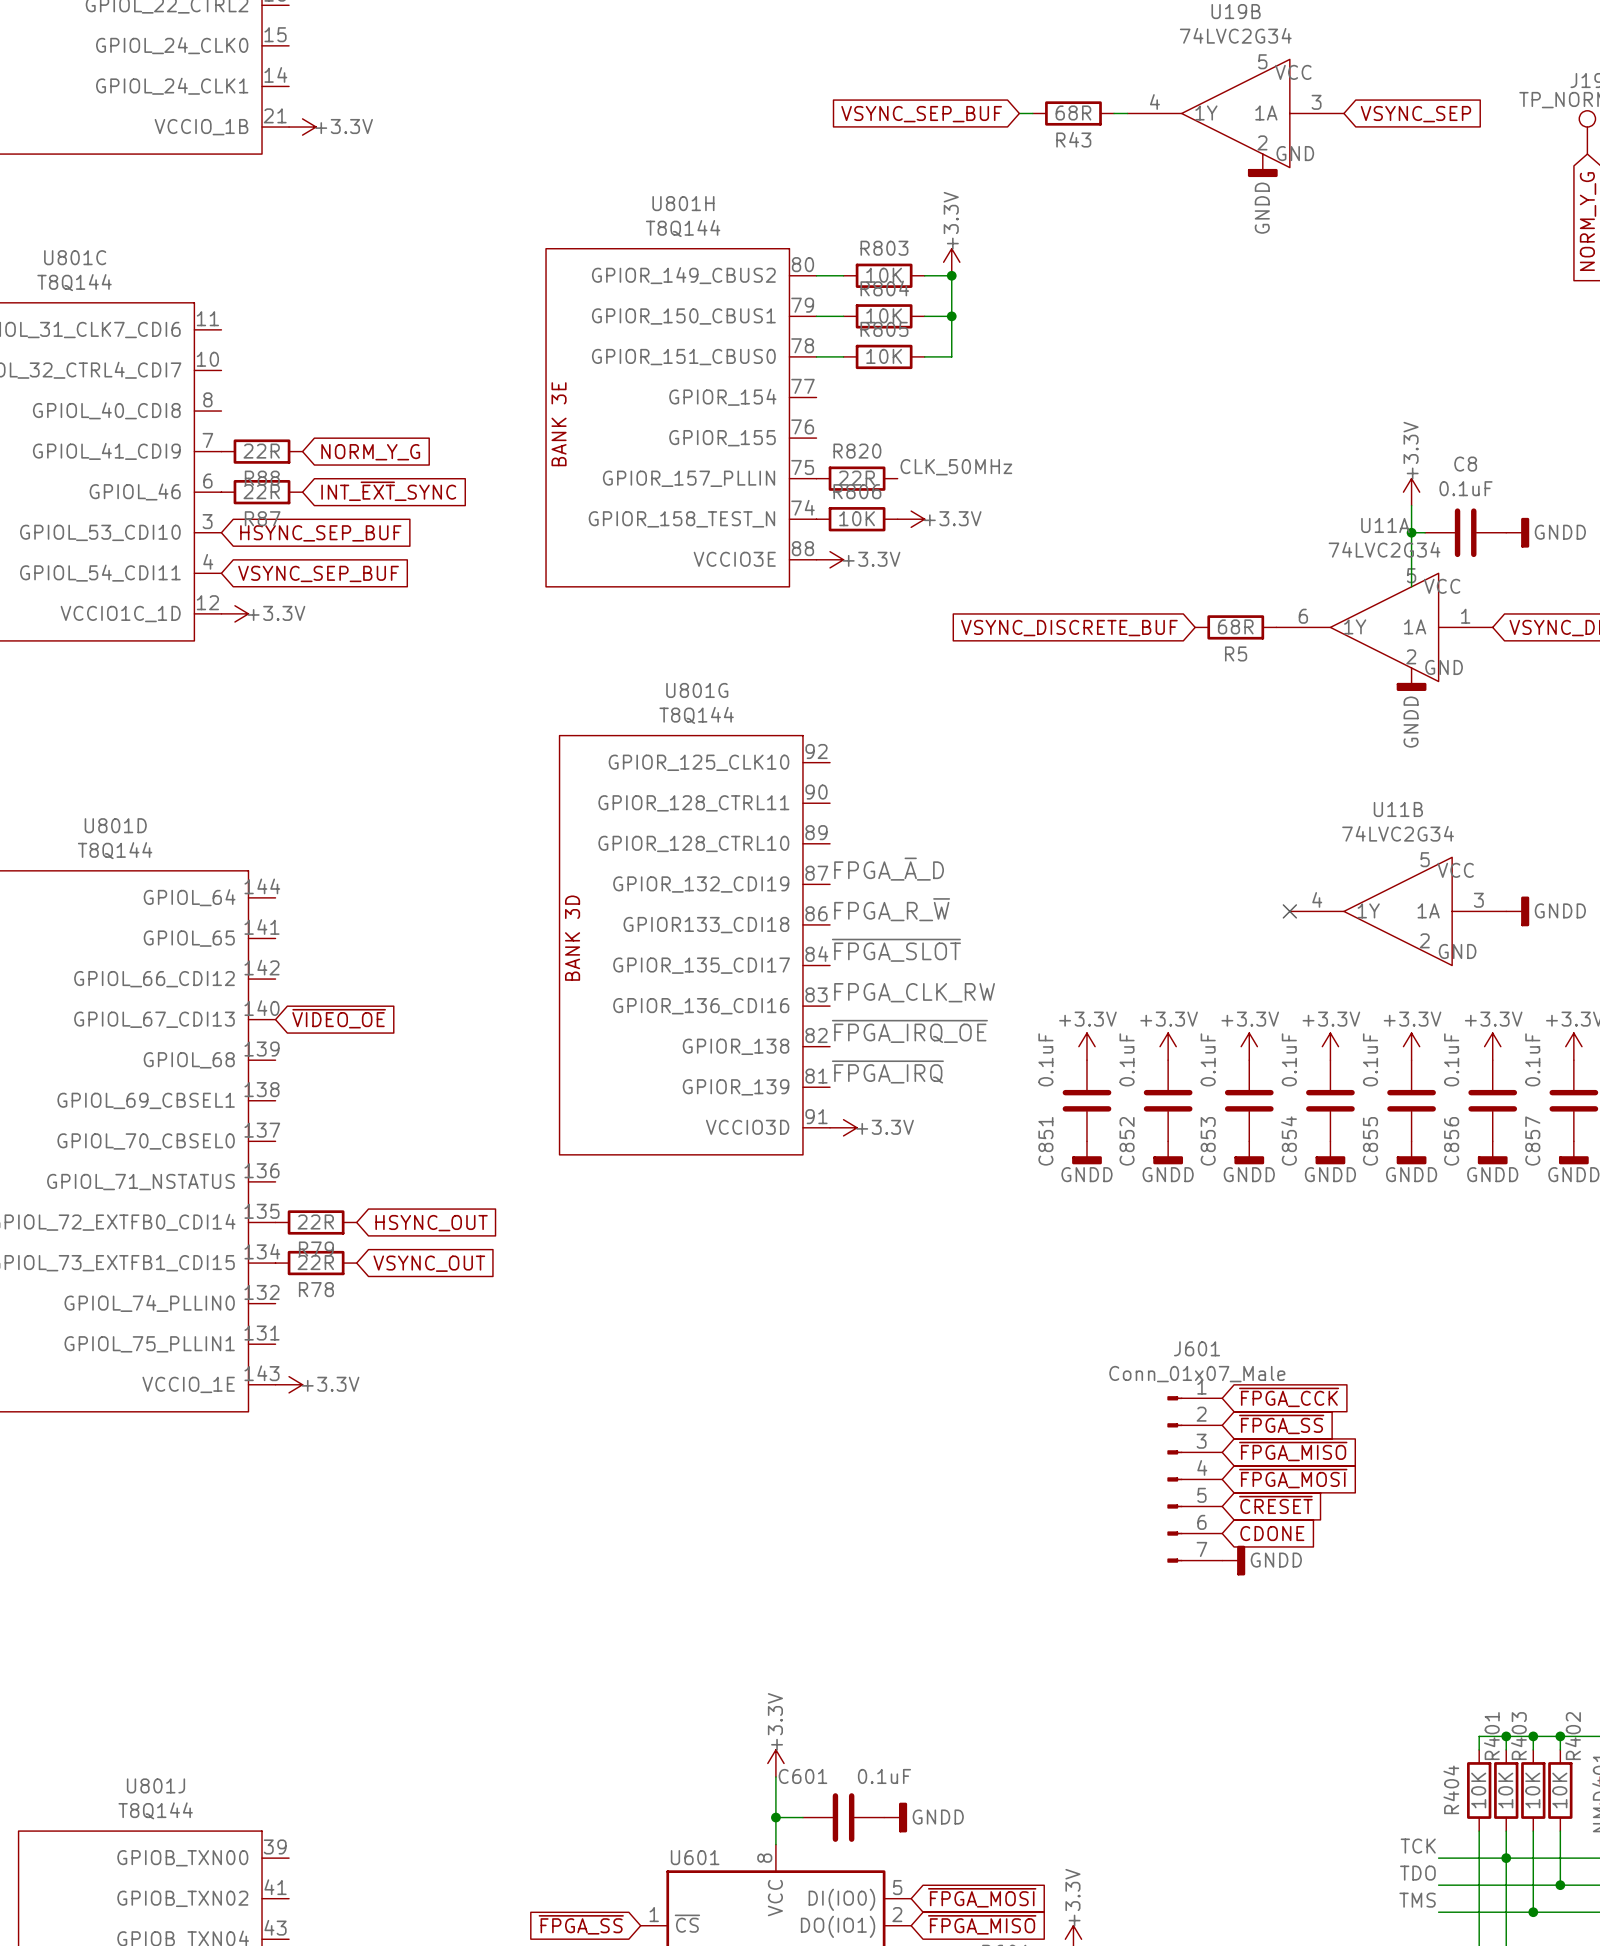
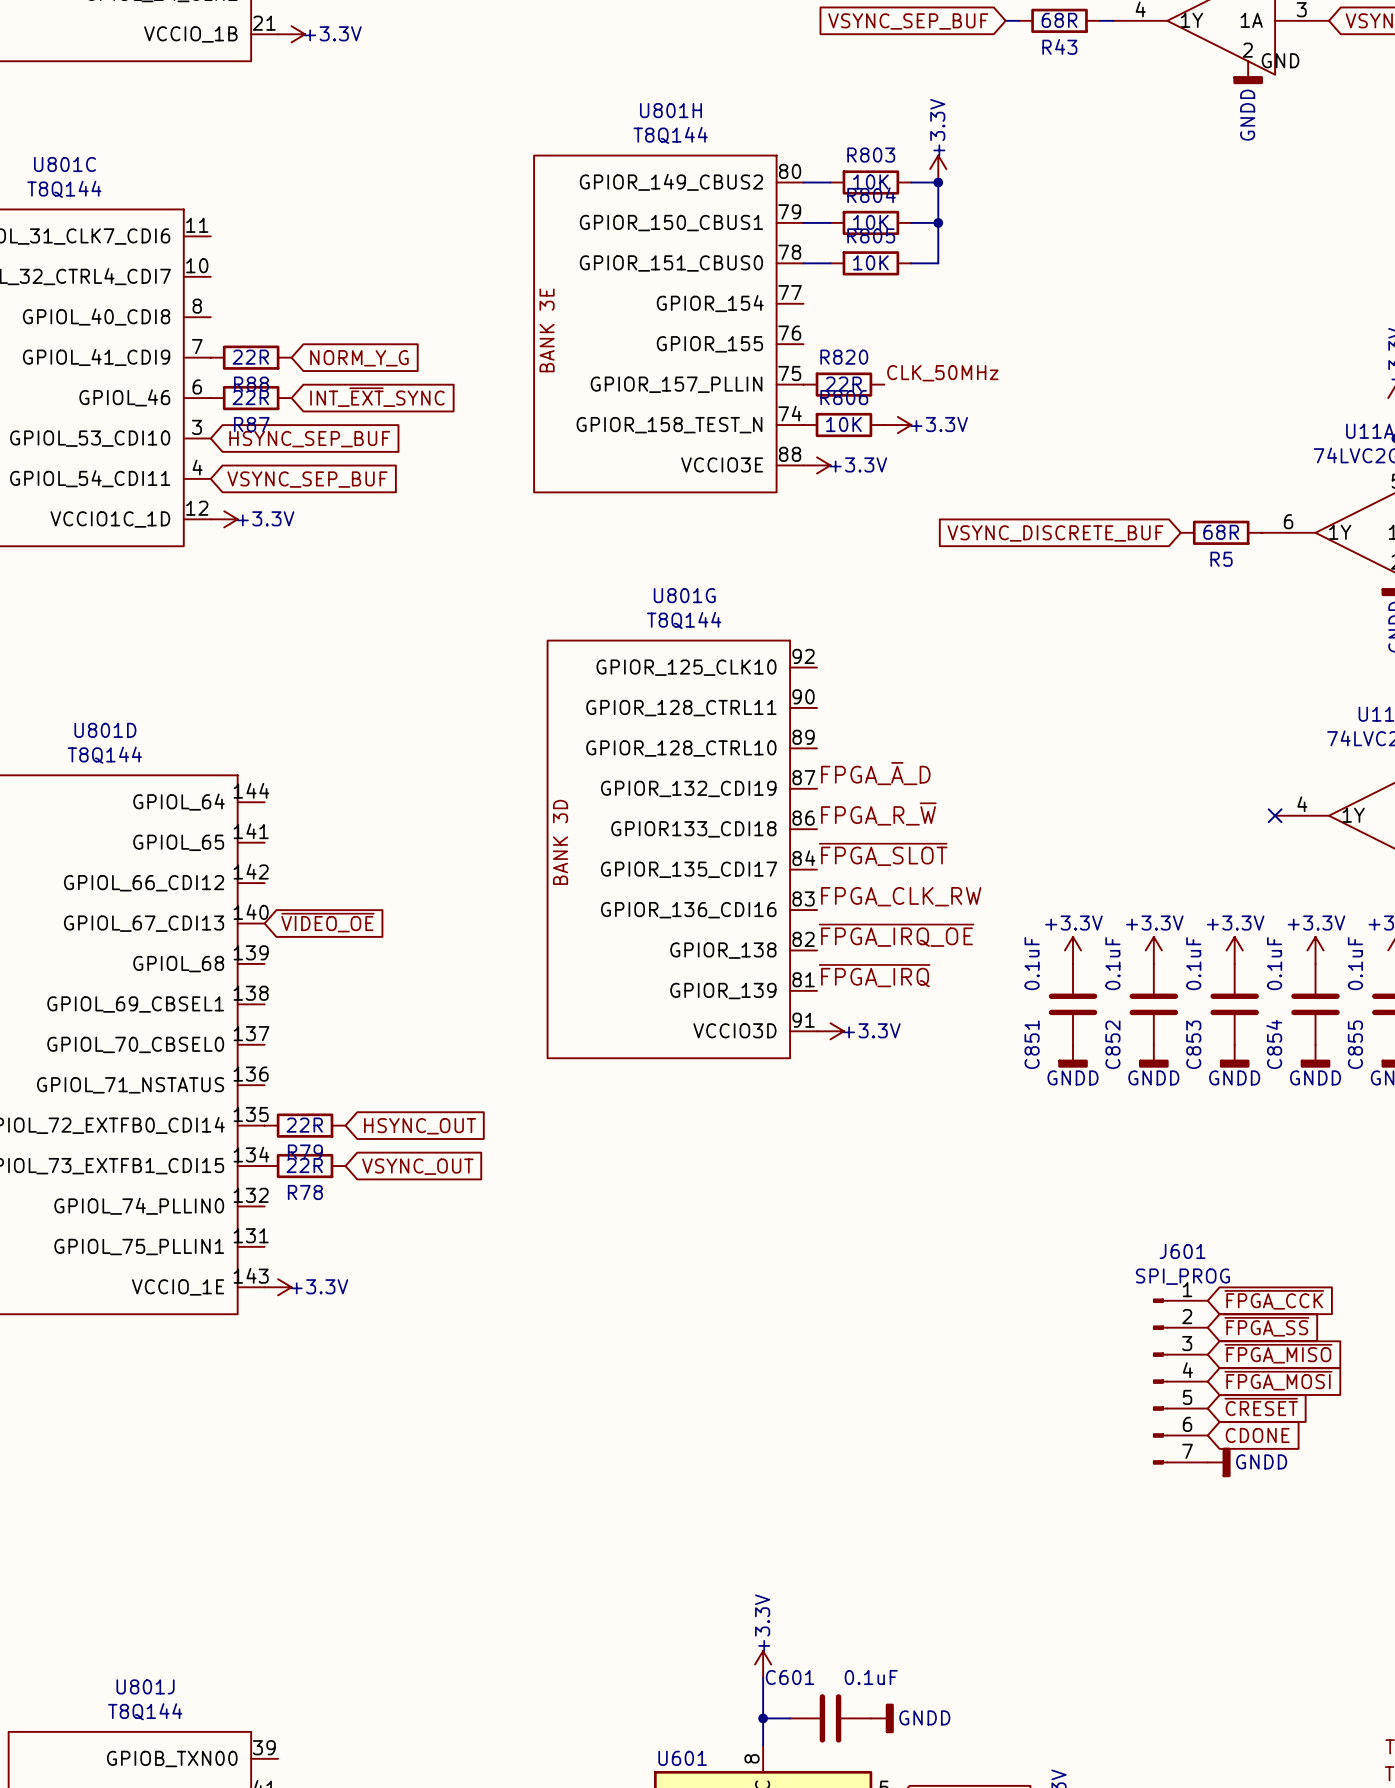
J601 value: Conn_01x07_Male (1197, 1374) -> SPI_PROG (1182, 1276)

